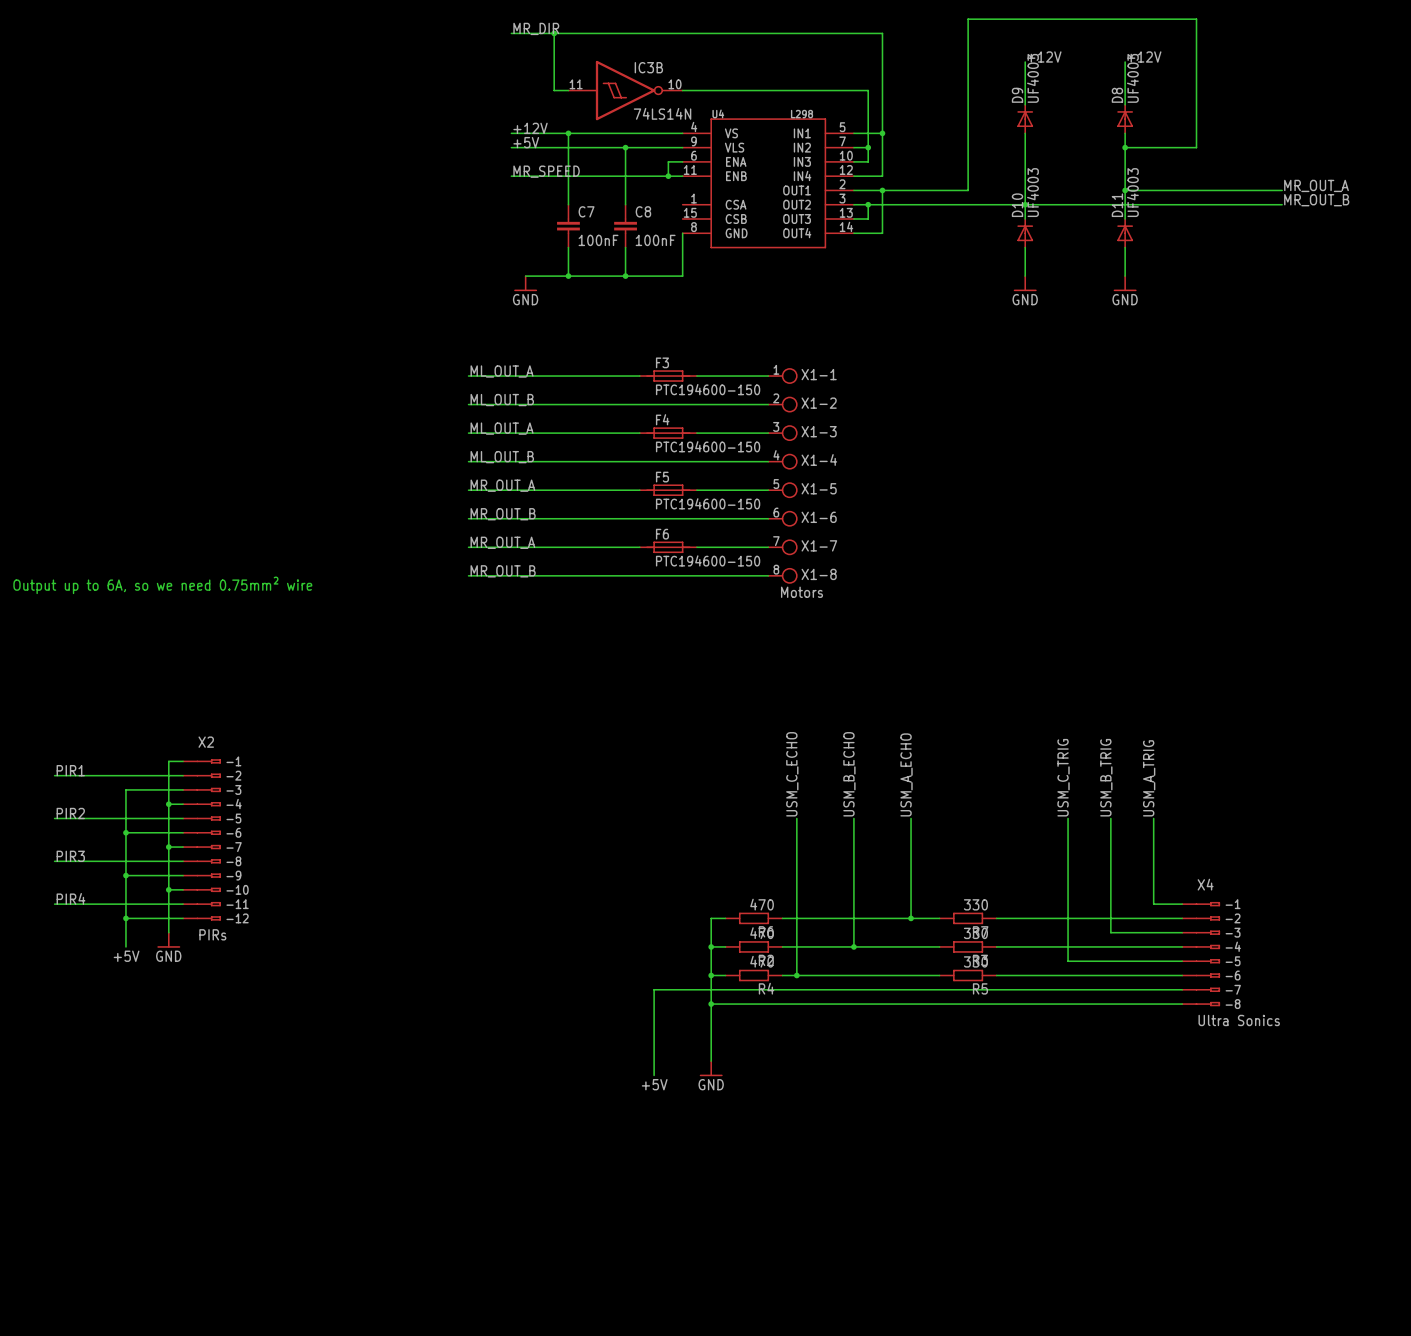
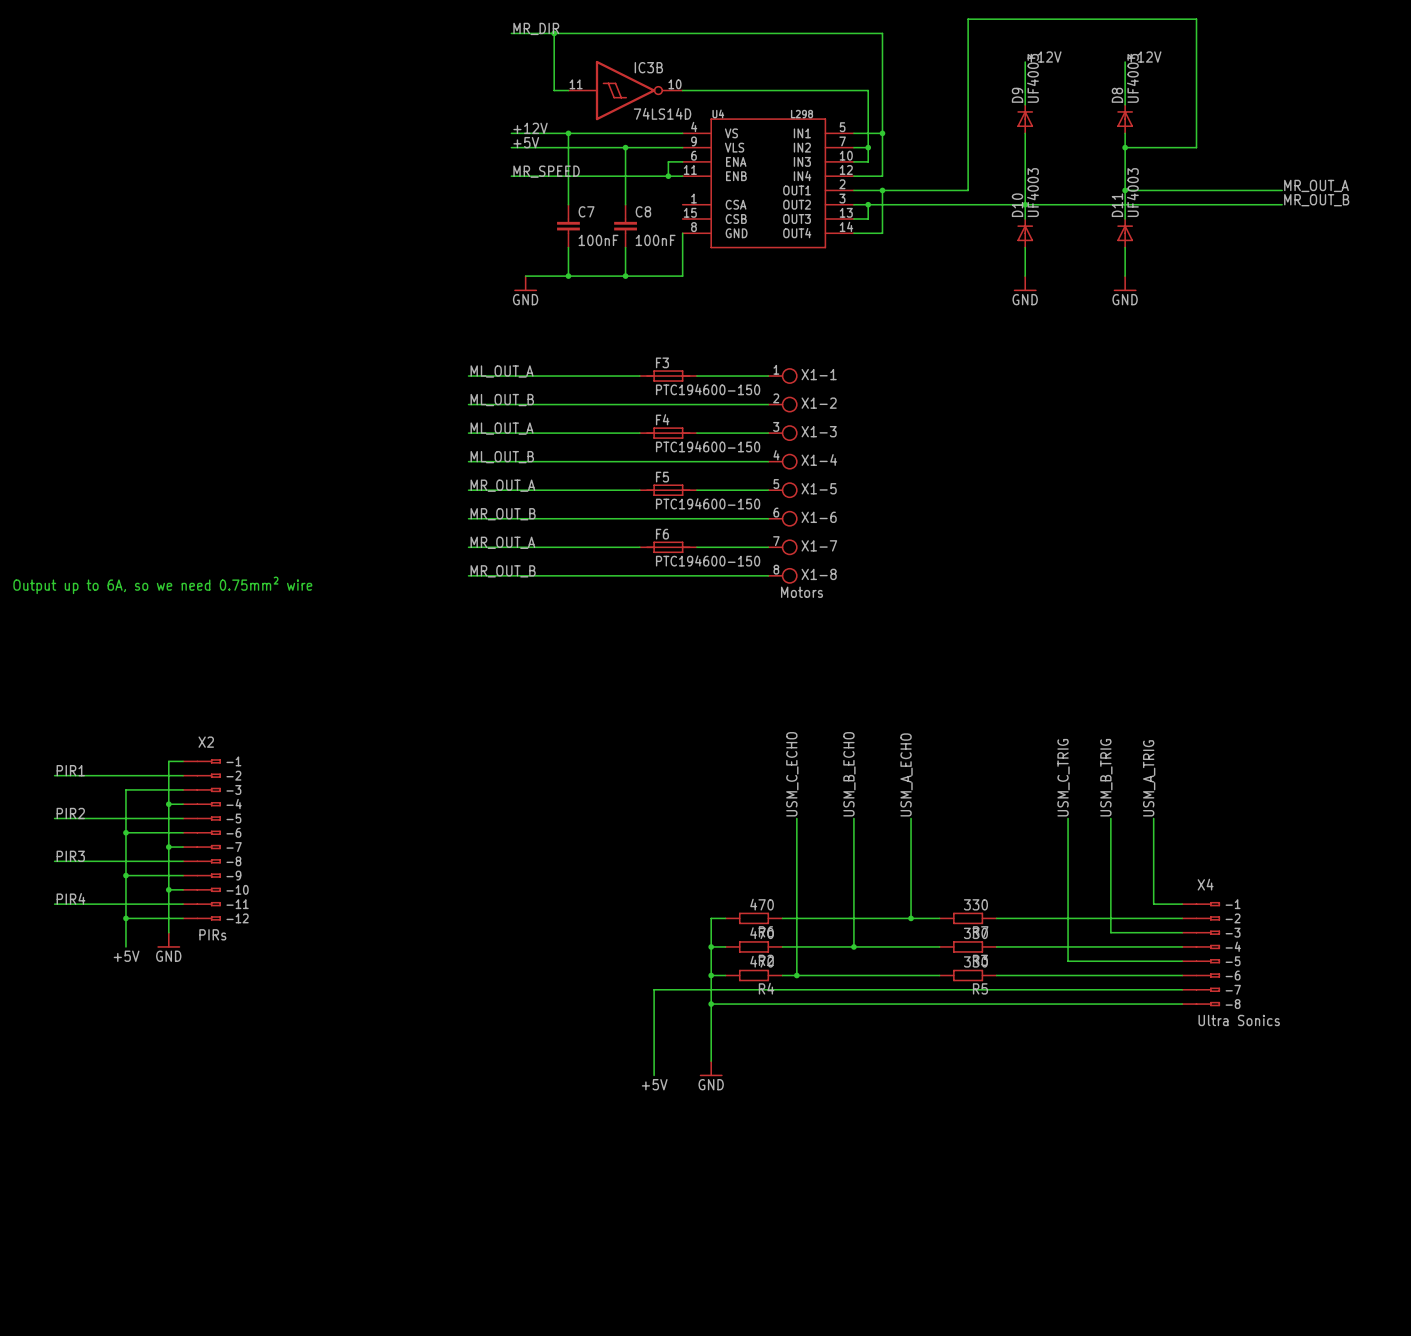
IC3B value: 74LS14N (662, 113) -> 74LS14D (662, 113)

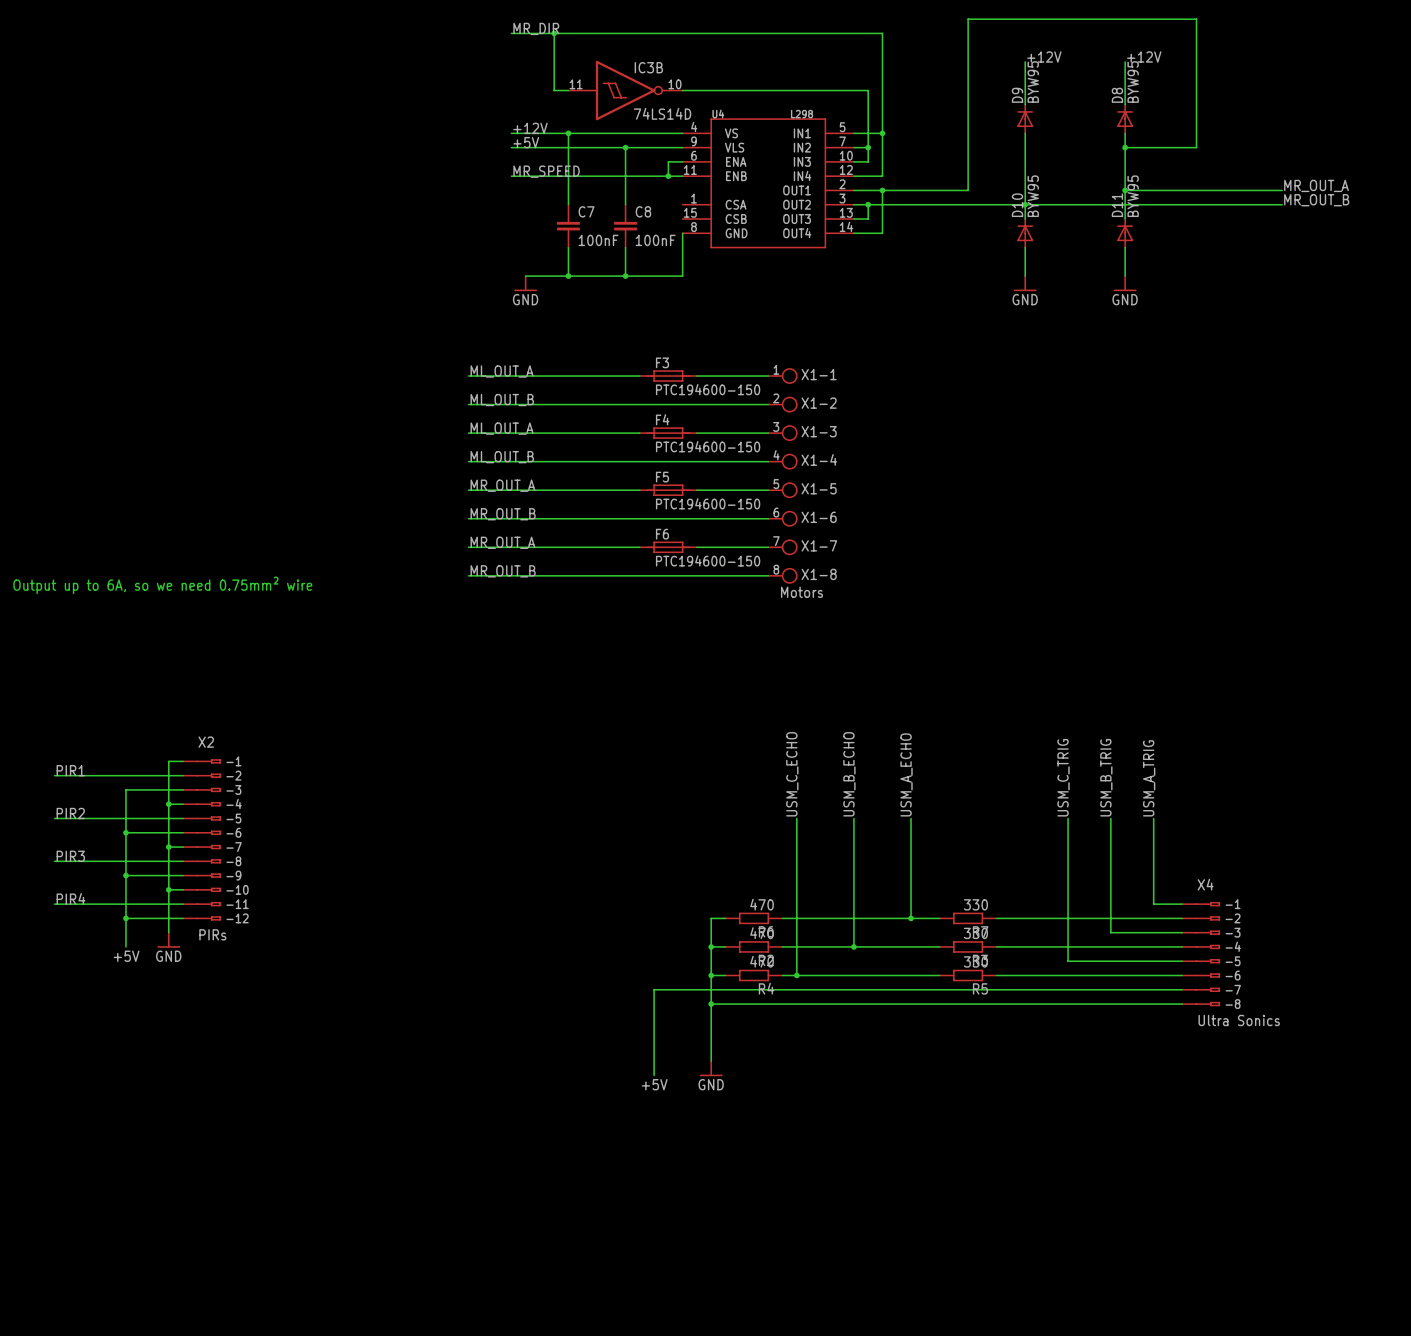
D9 value: UF4003 (1032, 78) -> BYW95 (1033, 82)
D8 value: UF4003 (1132, 78) -> BYW95 (1133, 82)
D10 value: UF4003 (1032, 192) -> BYW95 (1033, 196)
D11 value: UF4003 (1132, 192) -> BYW95 (1133, 196)

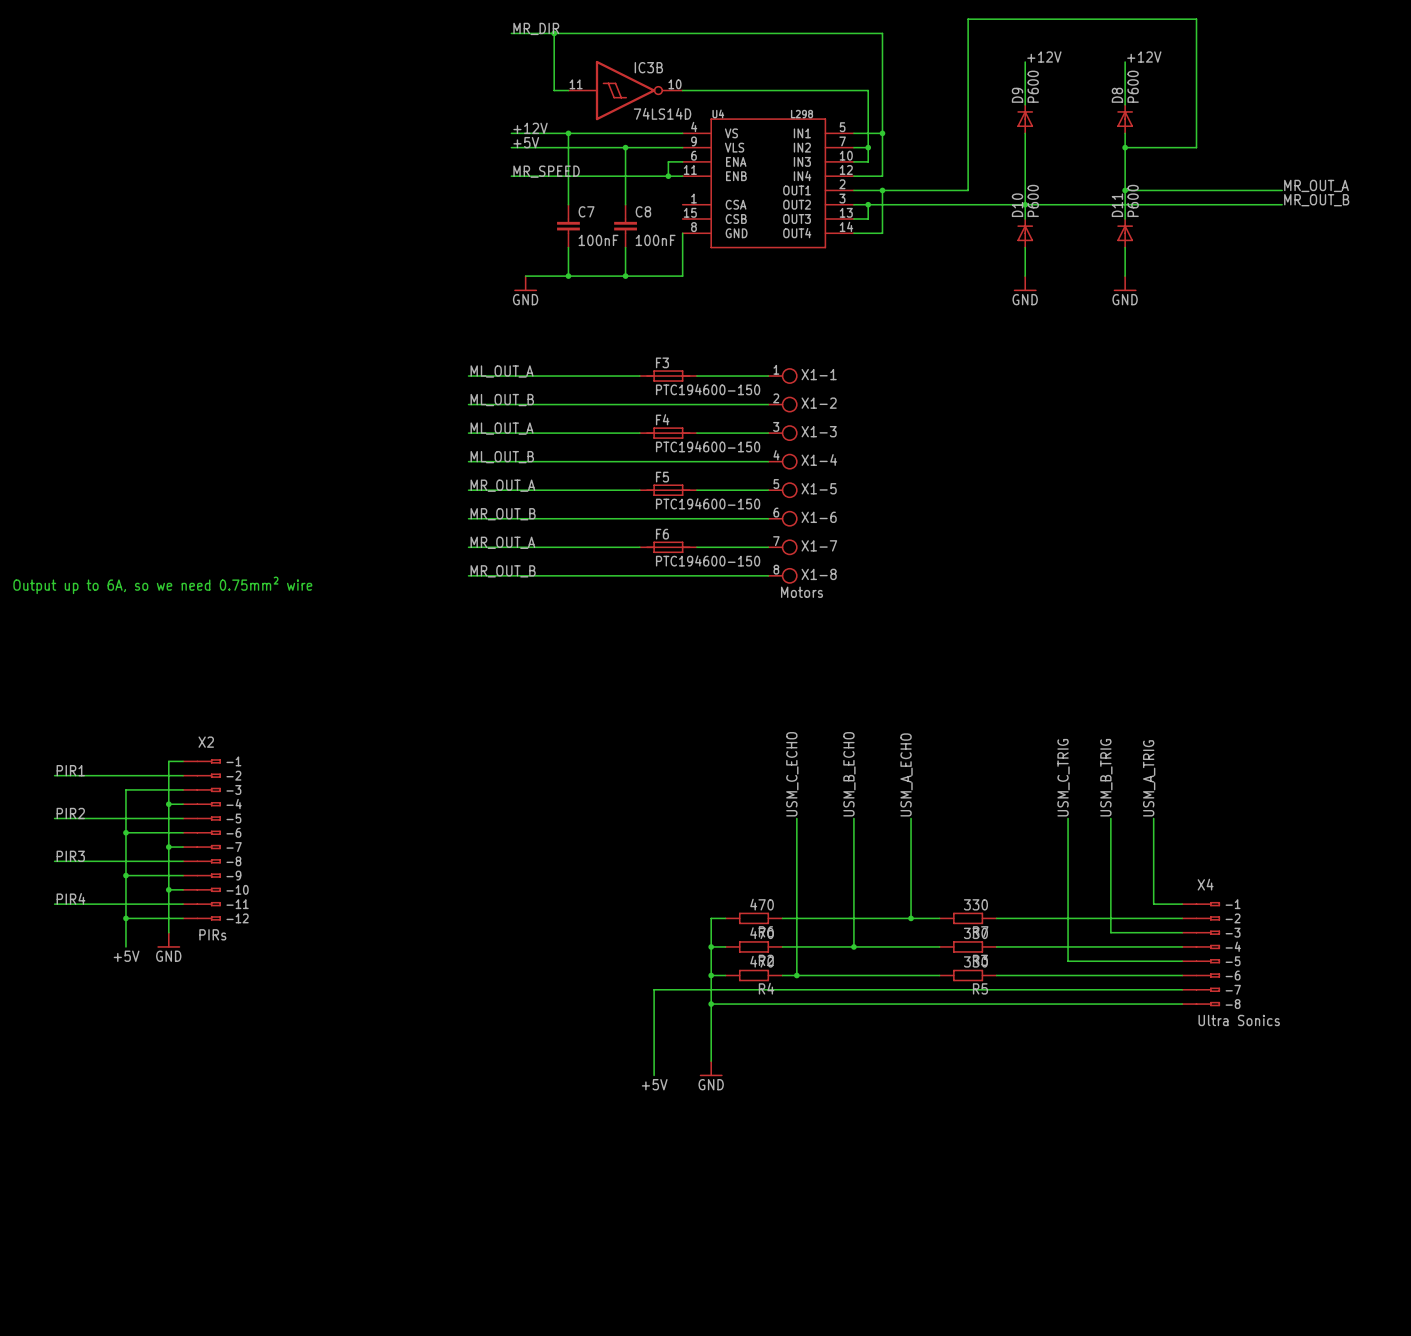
D9 value: BYW95 (1033, 82) -> P600 (1033, 86)
D8 value: BYW95 (1133, 82) -> P600 (1133, 86)
D10 value: BYW95 (1033, 196) -> P600 (1033, 200)
D11 value: BYW95 (1133, 196) -> P600 (1133, 200)

